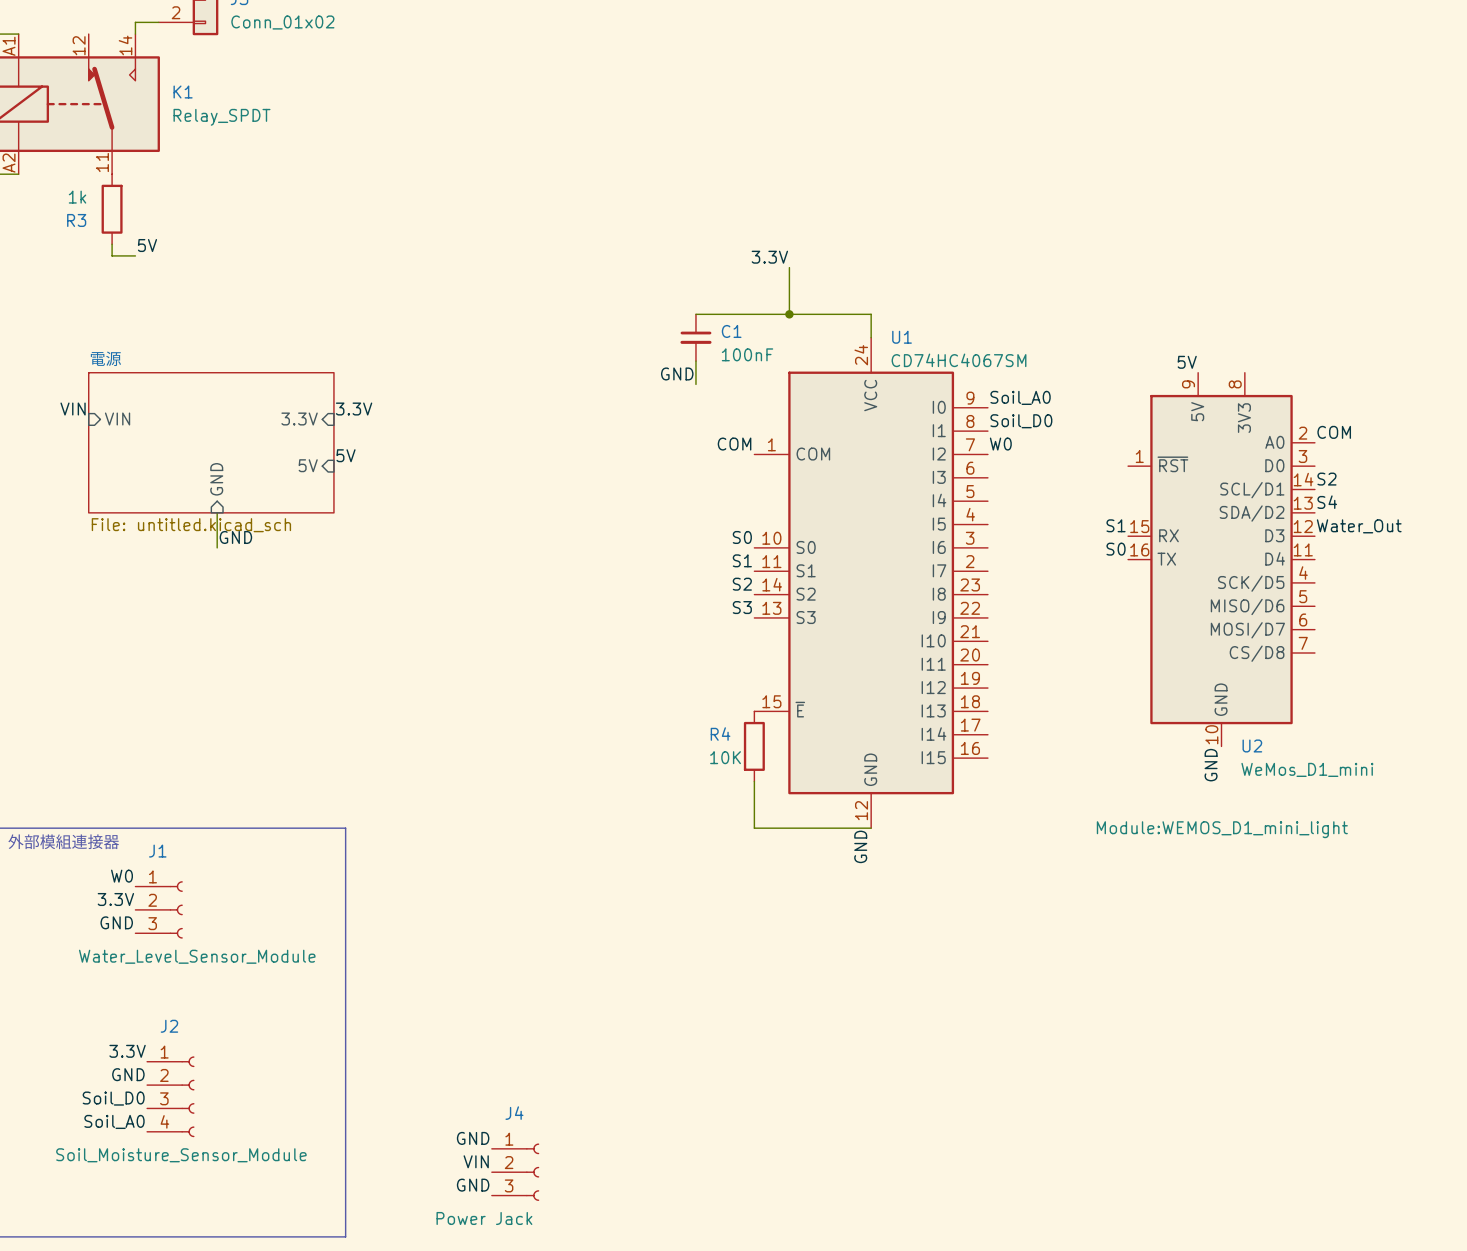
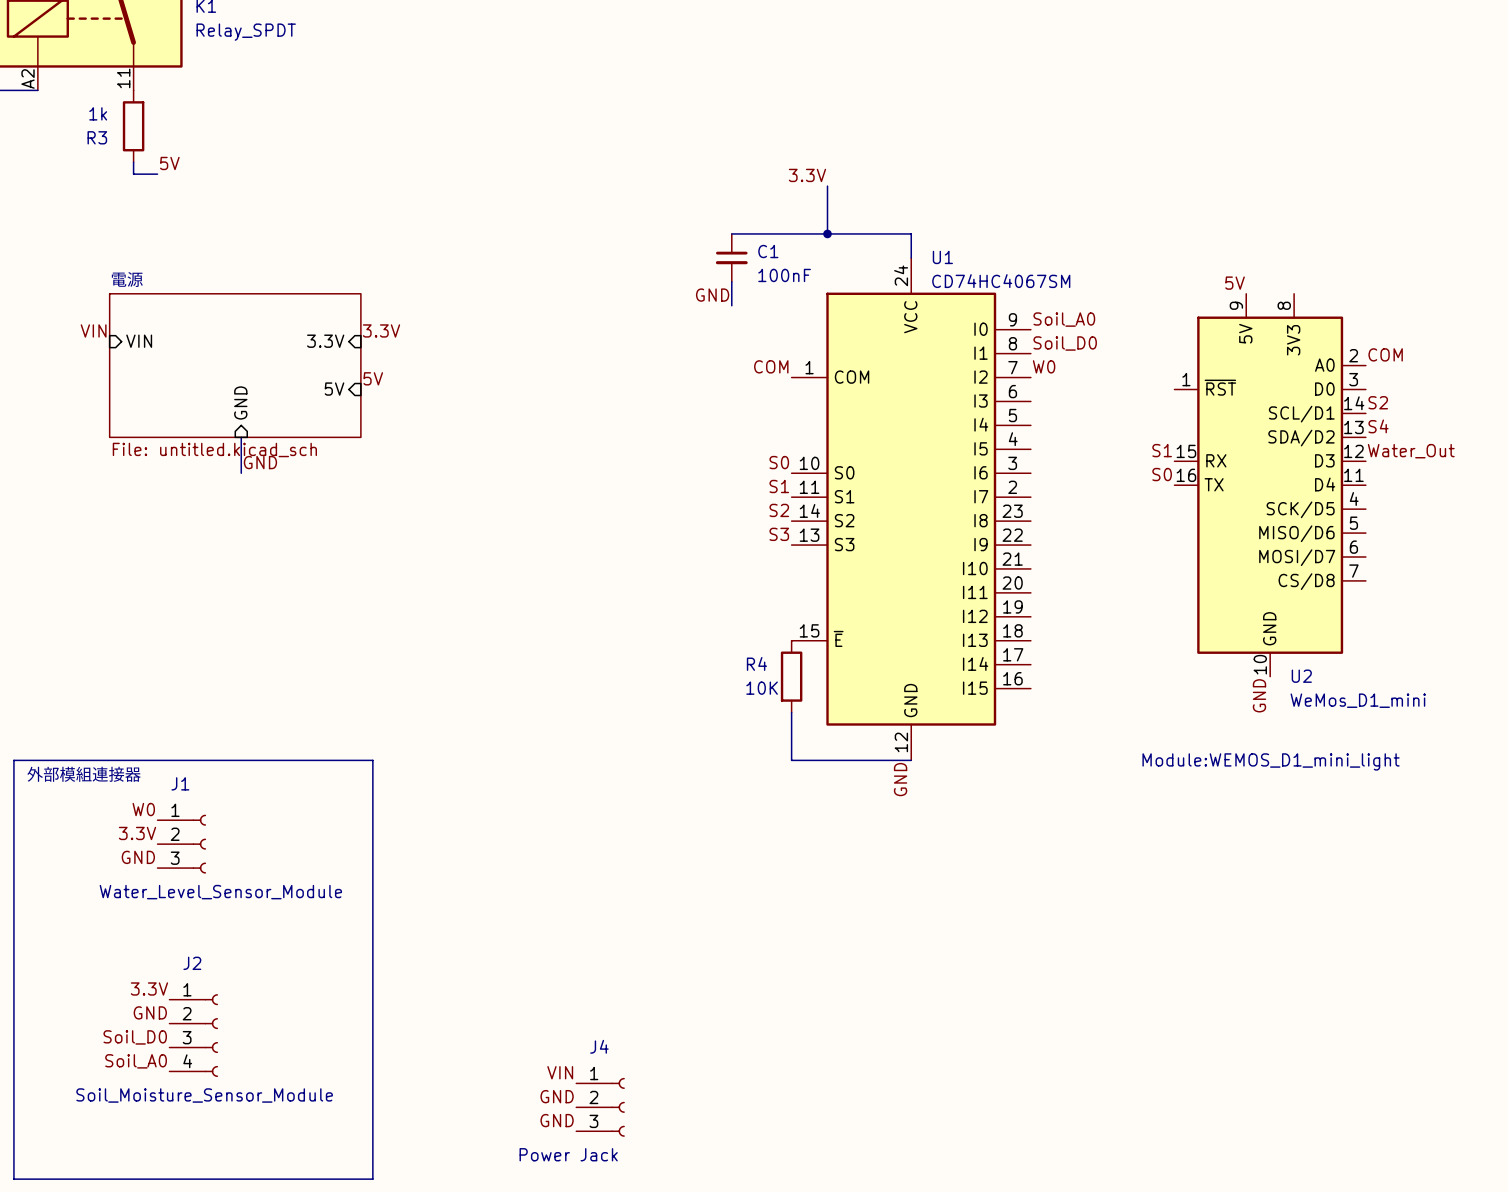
label: GND (473, 1138) -> none
label: none -> GND (557, 1096)
label position: VIN (476, 1161) -> VIN (560, 1072)
J4 position: (515, 1172) -> (600, 1107)
label: none -> GND (557, 1120)
label: GND (473, 1185) -> none

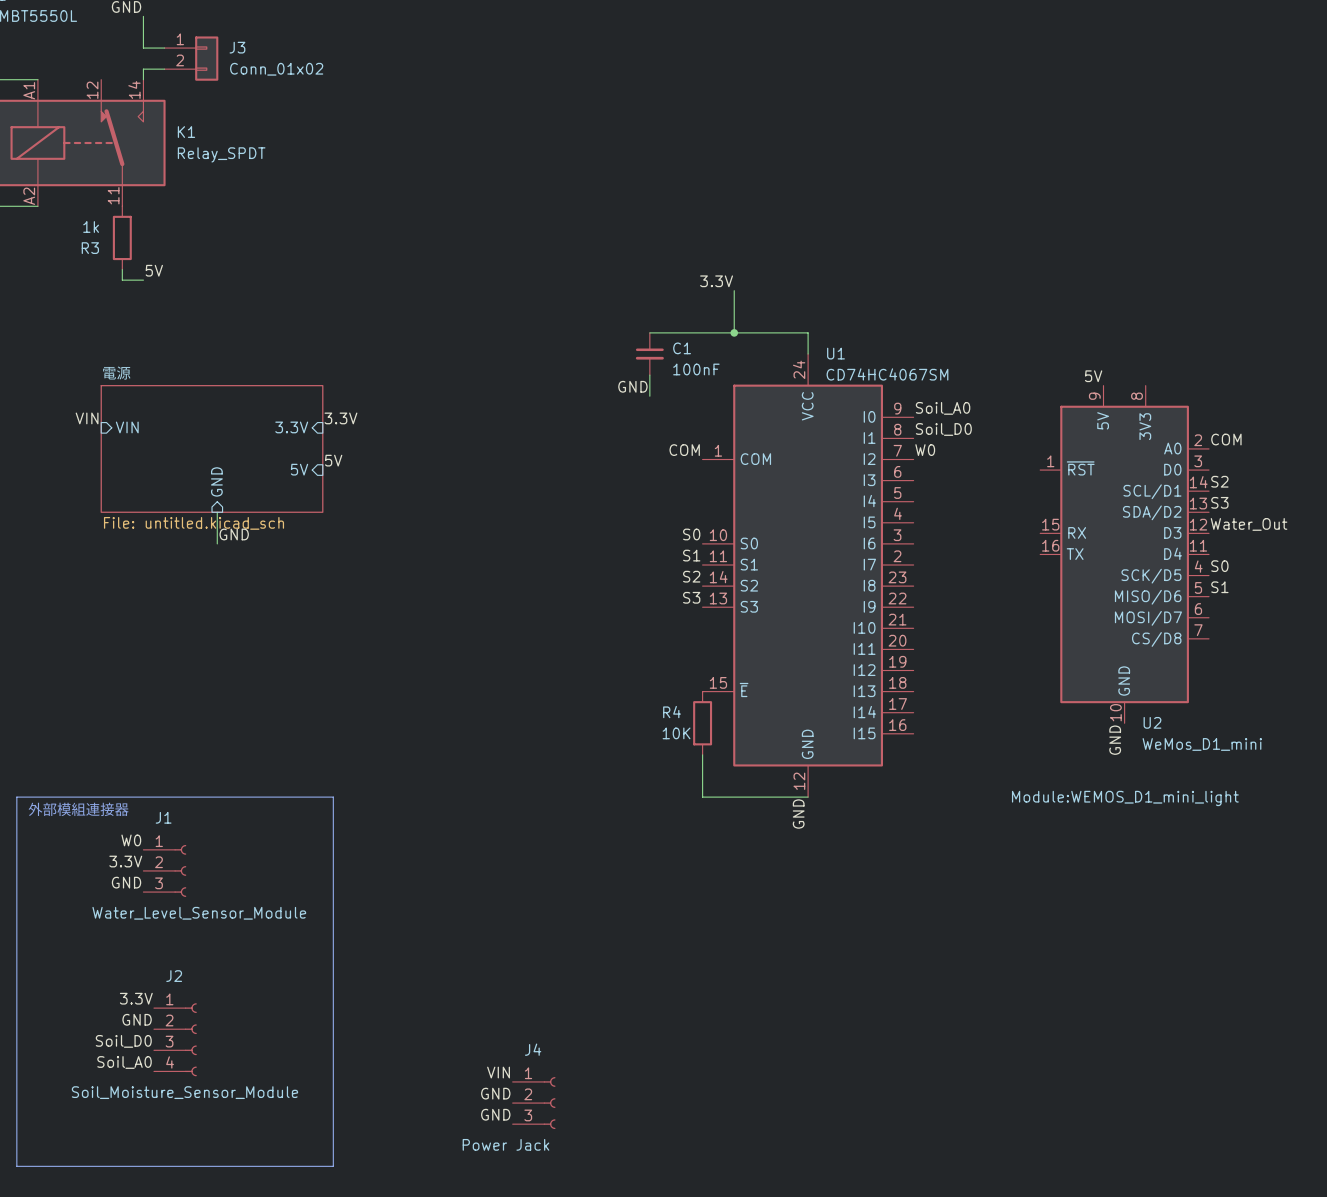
label: S4 (1378, 426) -> S3 (1219, 502)
label position: S1 (1162, 450) -> S1 (1219, 587)
label position: S0 (1162, 474) -> S0 (1219, 566)

